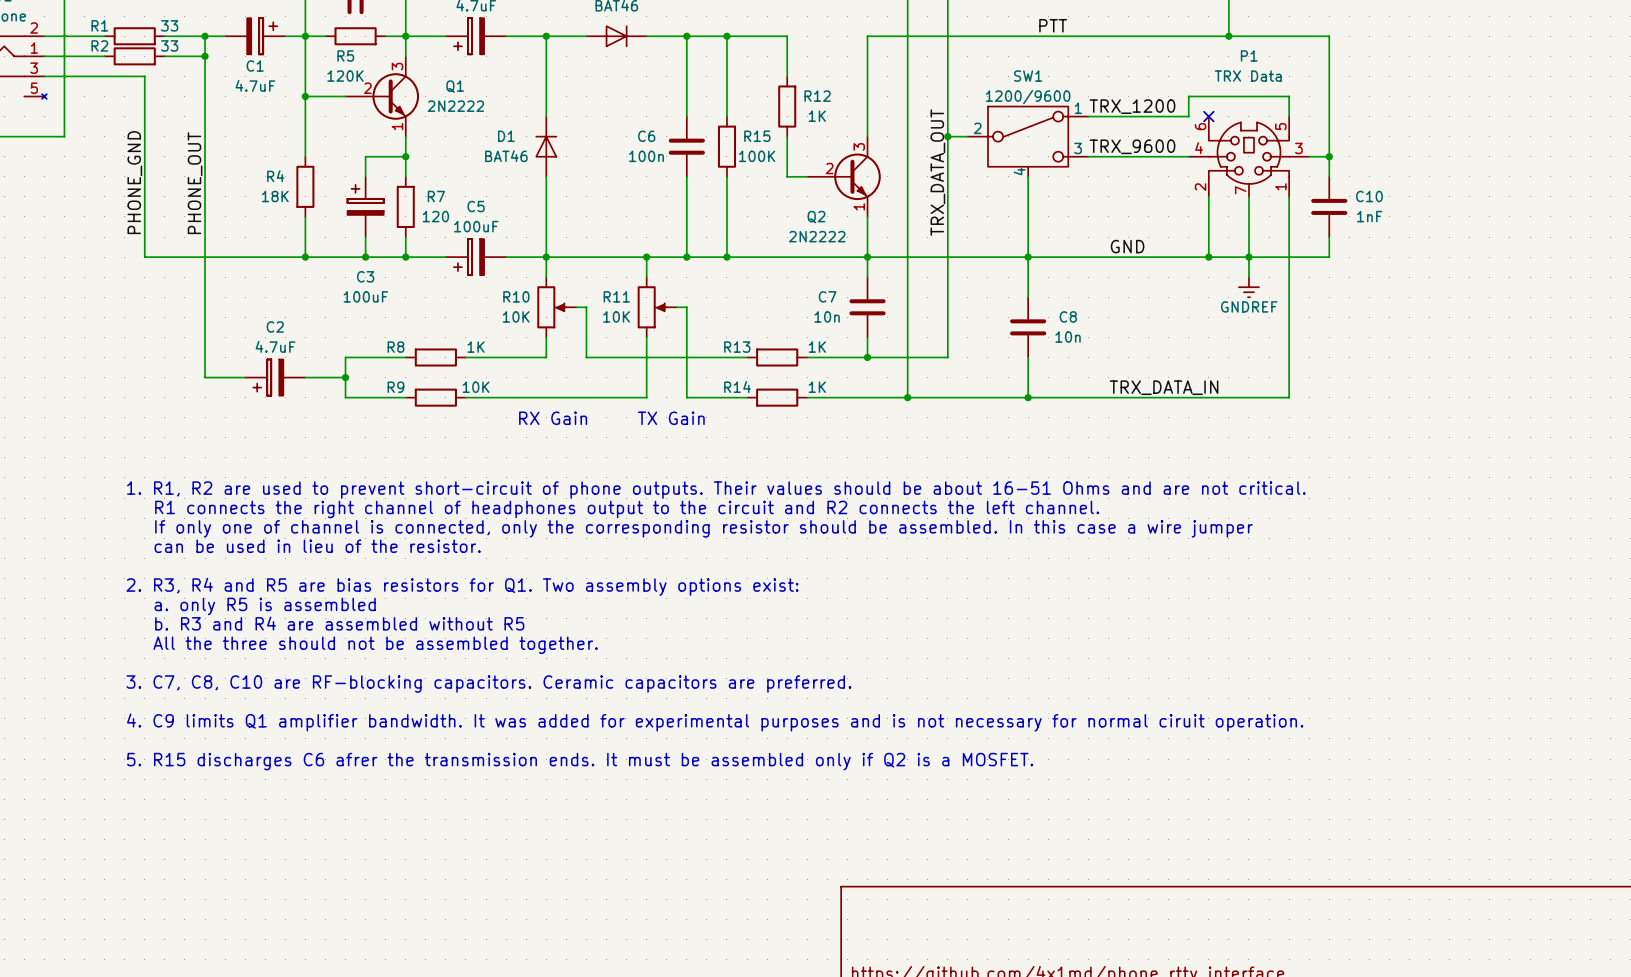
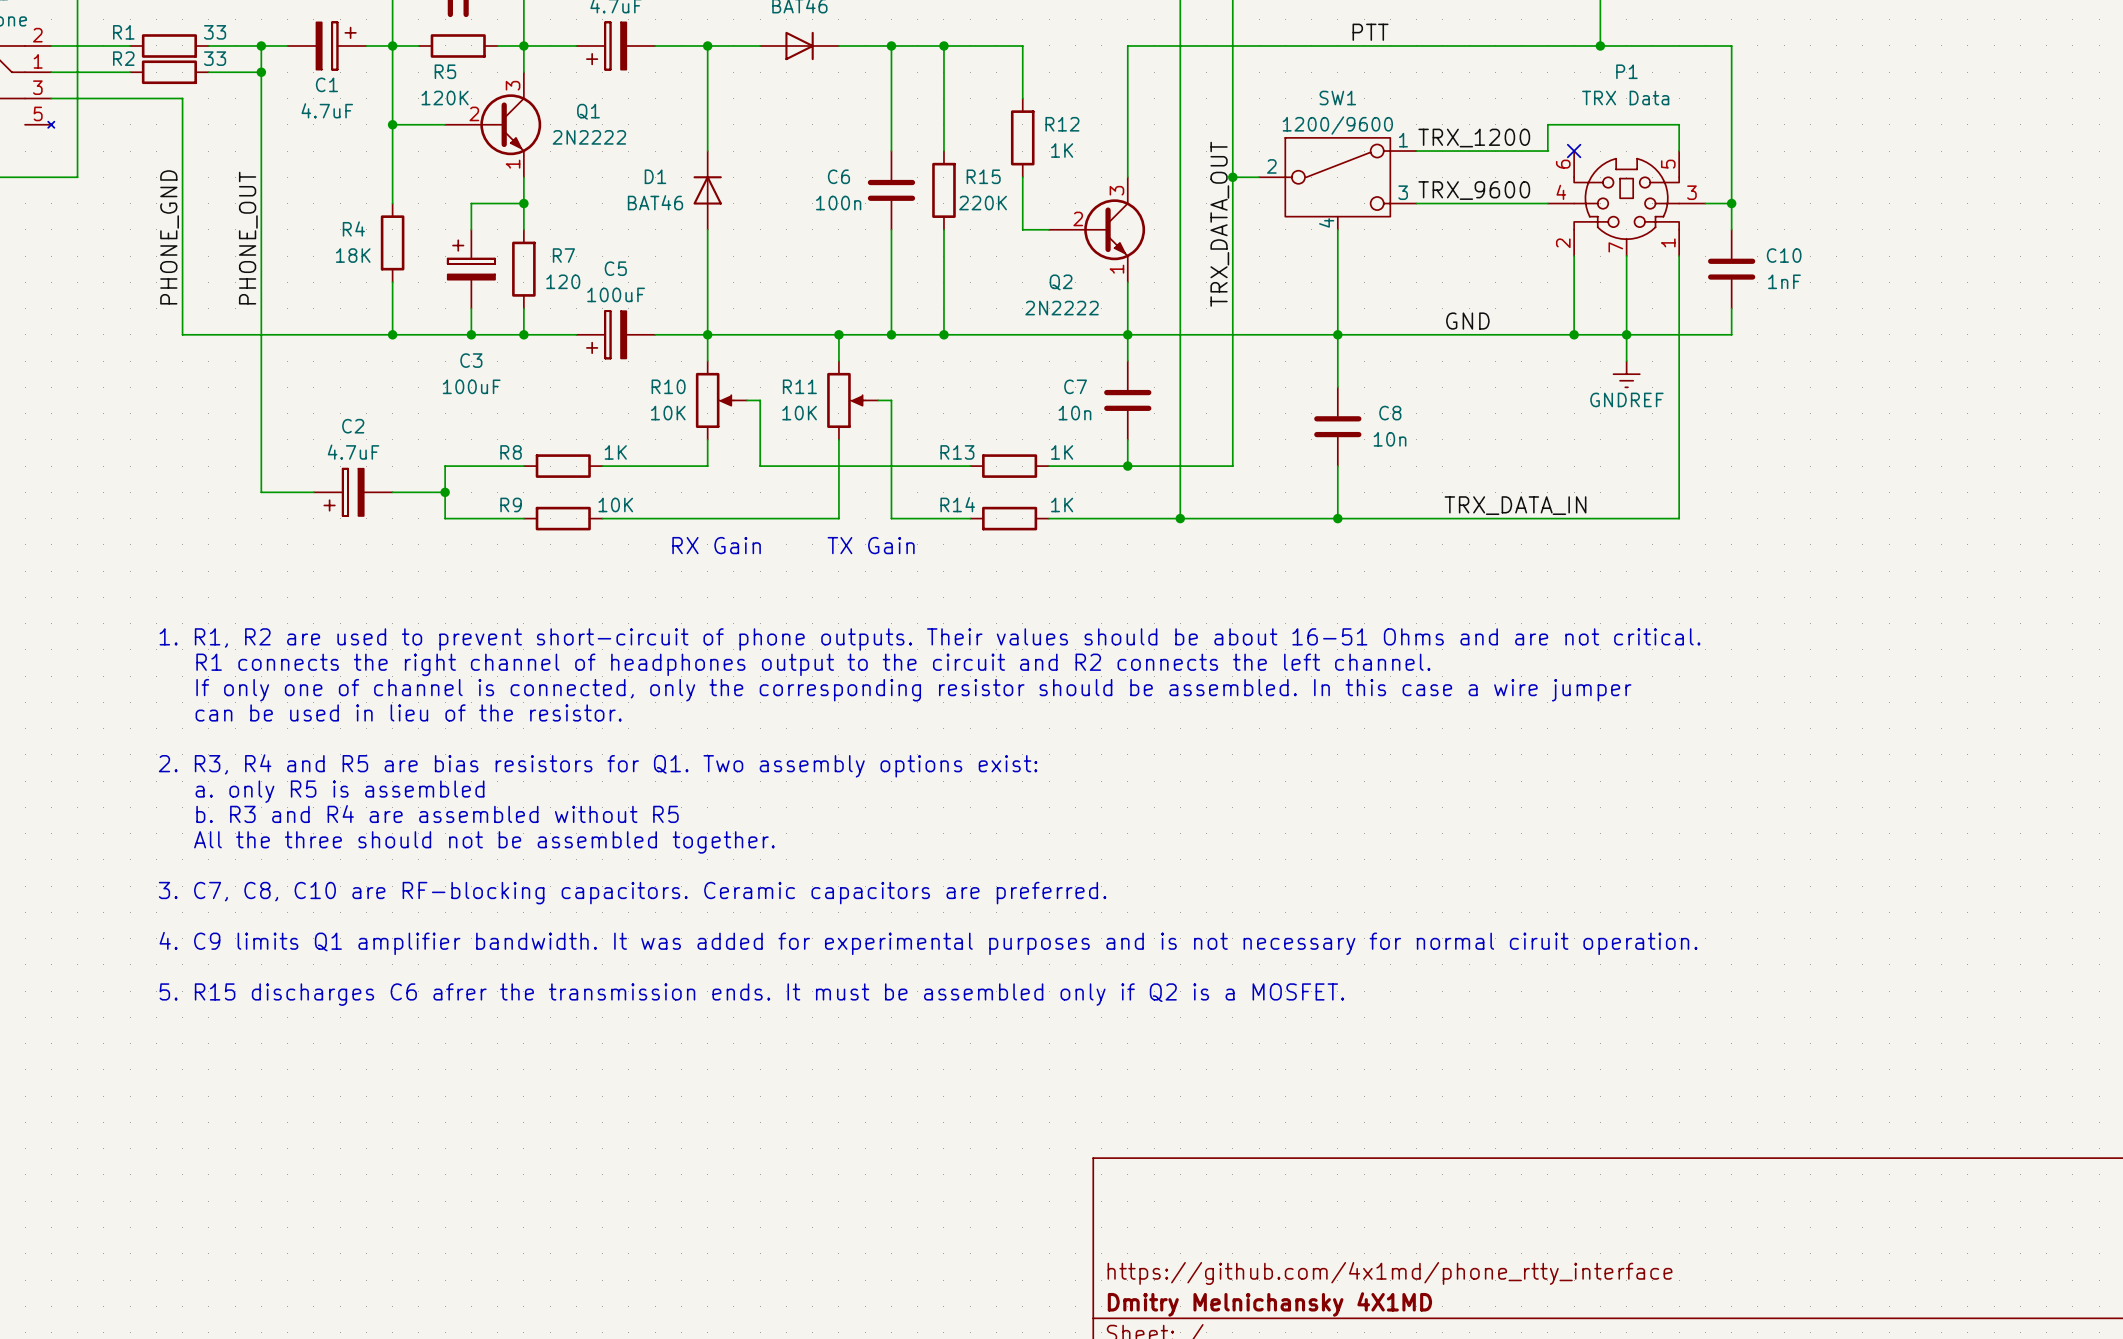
R15 value: 100K (757, 156) -> 220K (983, 203)

